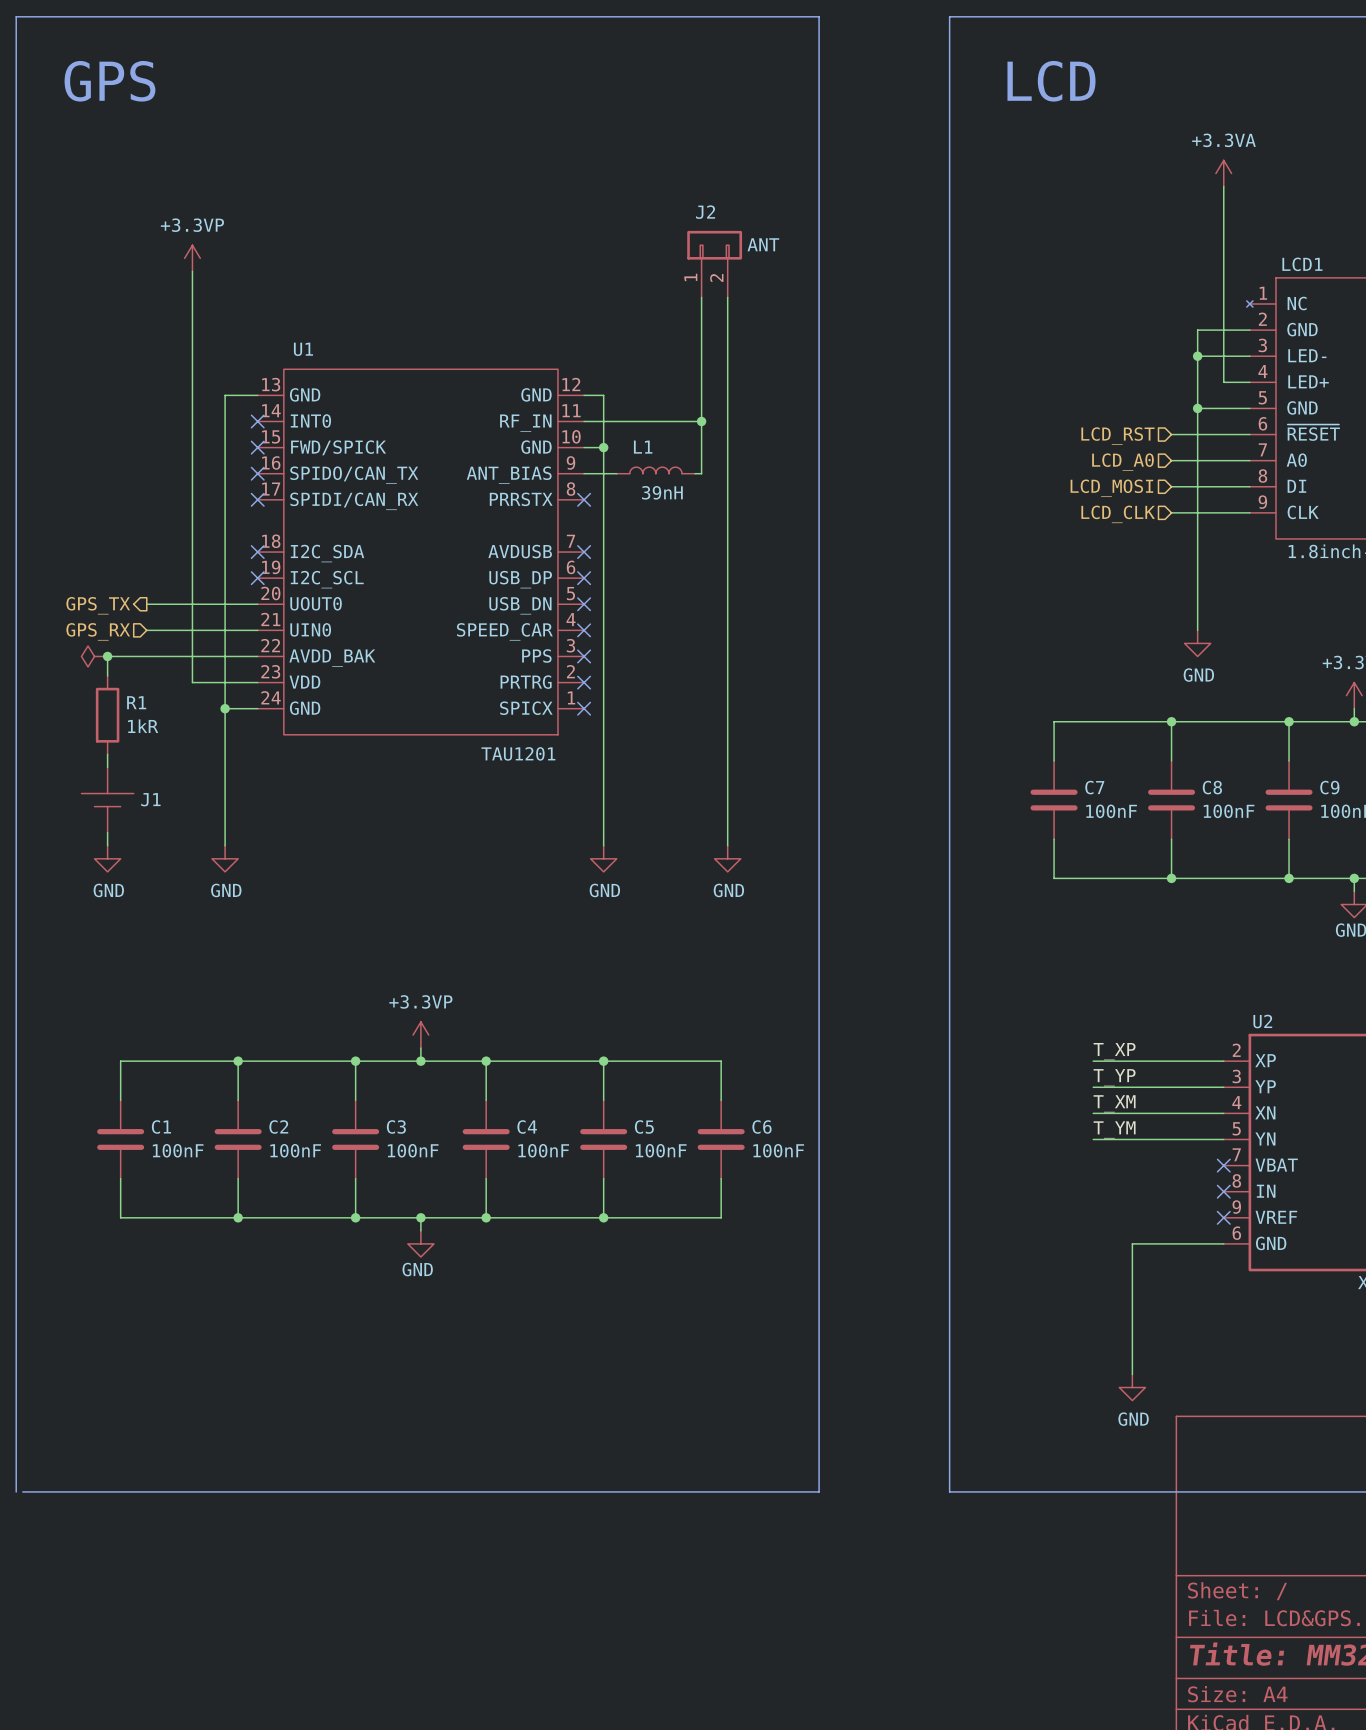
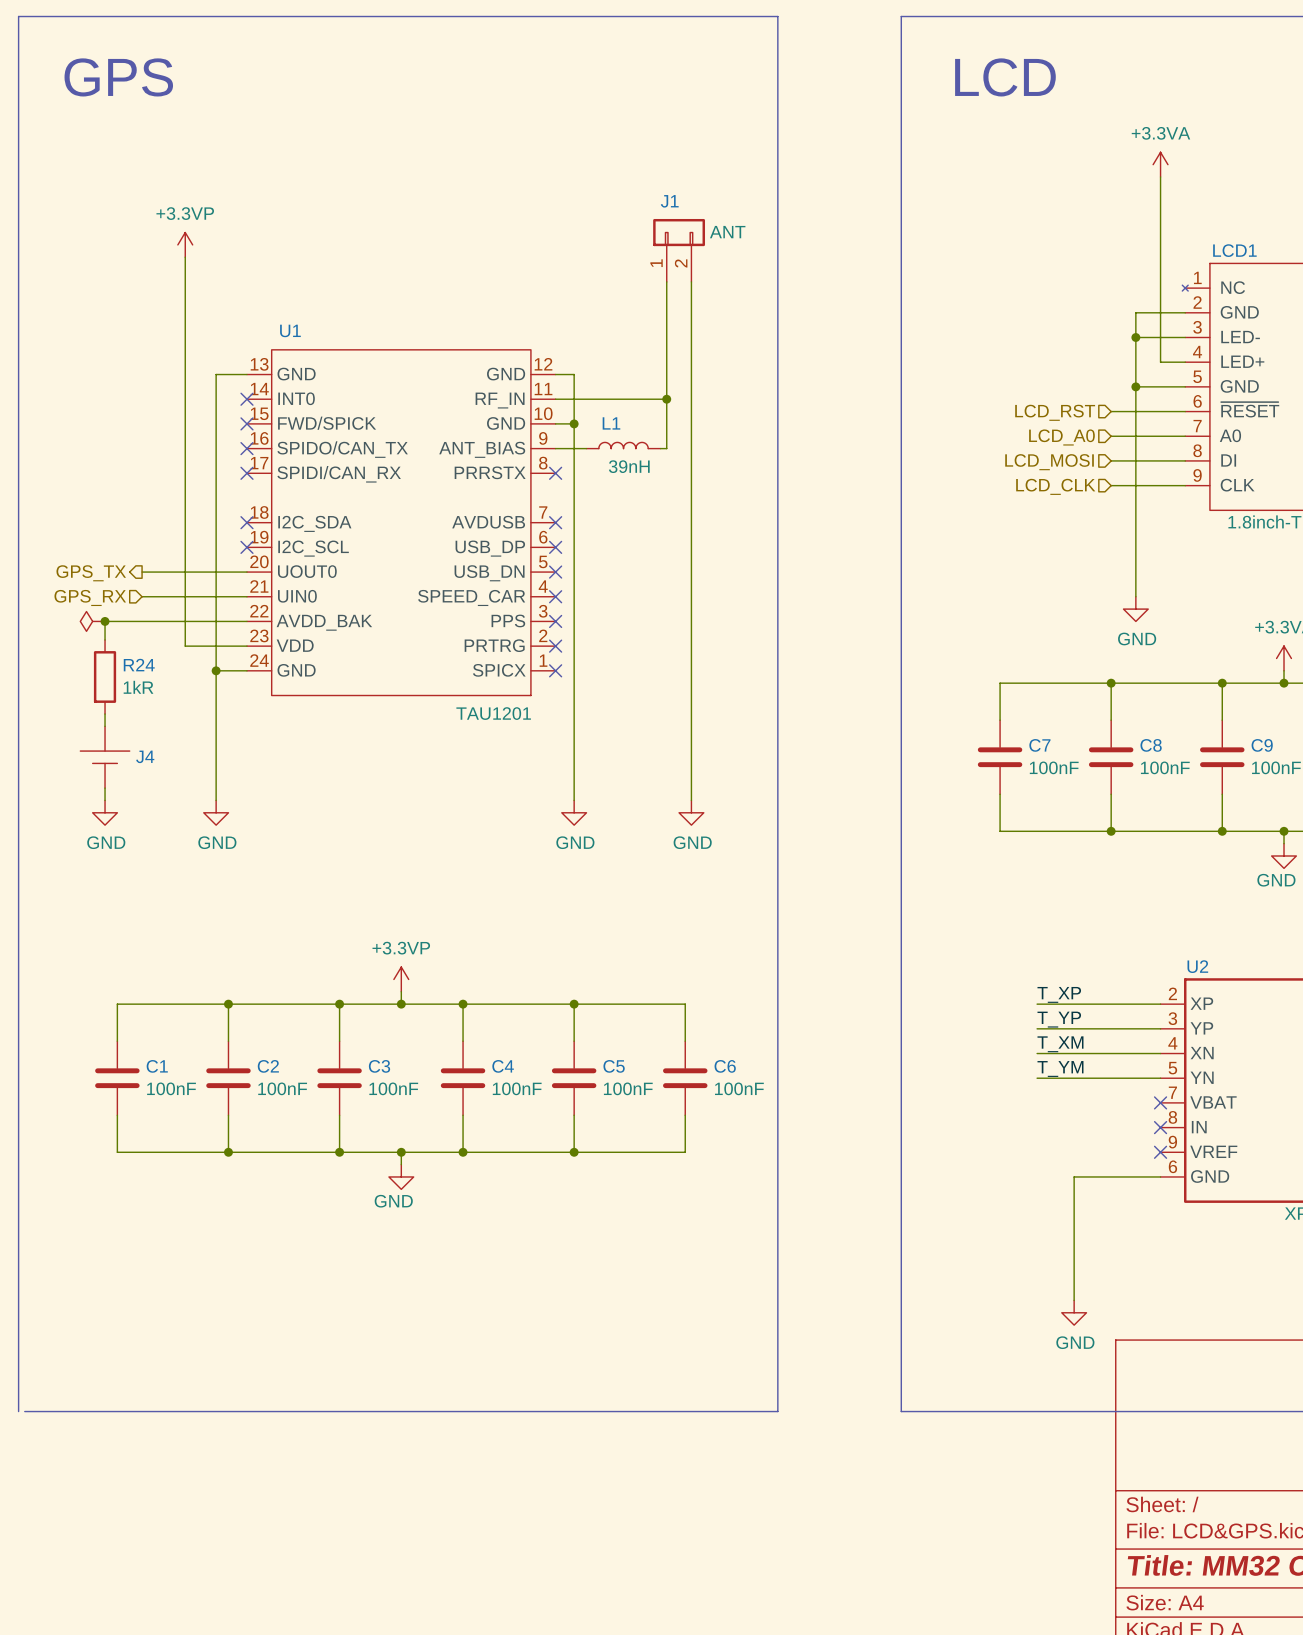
J2 name: J2 (705, 212) -> J1 (669, 201)
R1 name: R1 (136, 702) -> R24 (139, 665)
J1 name: J1 (150, 799) -> J4 (145, 756)

